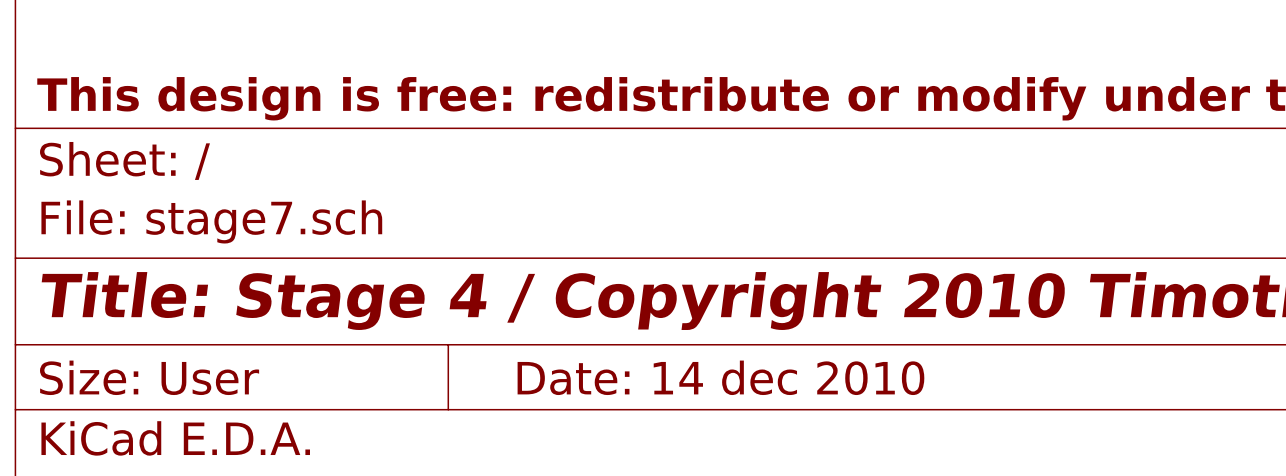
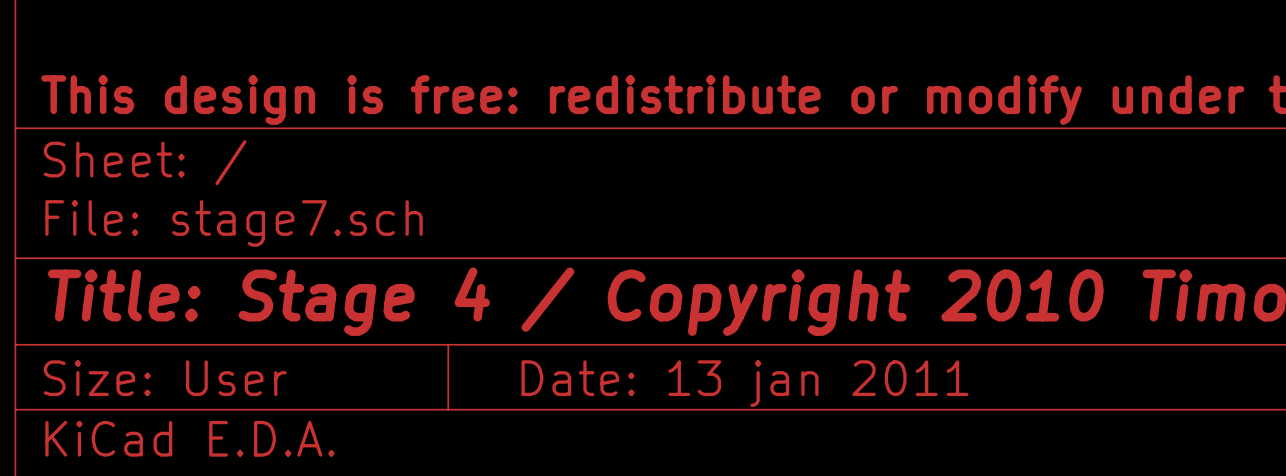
title block: Date: 14 dec 2010 (720, 377) -> Date: 13 jan 2011 (744, 383)

